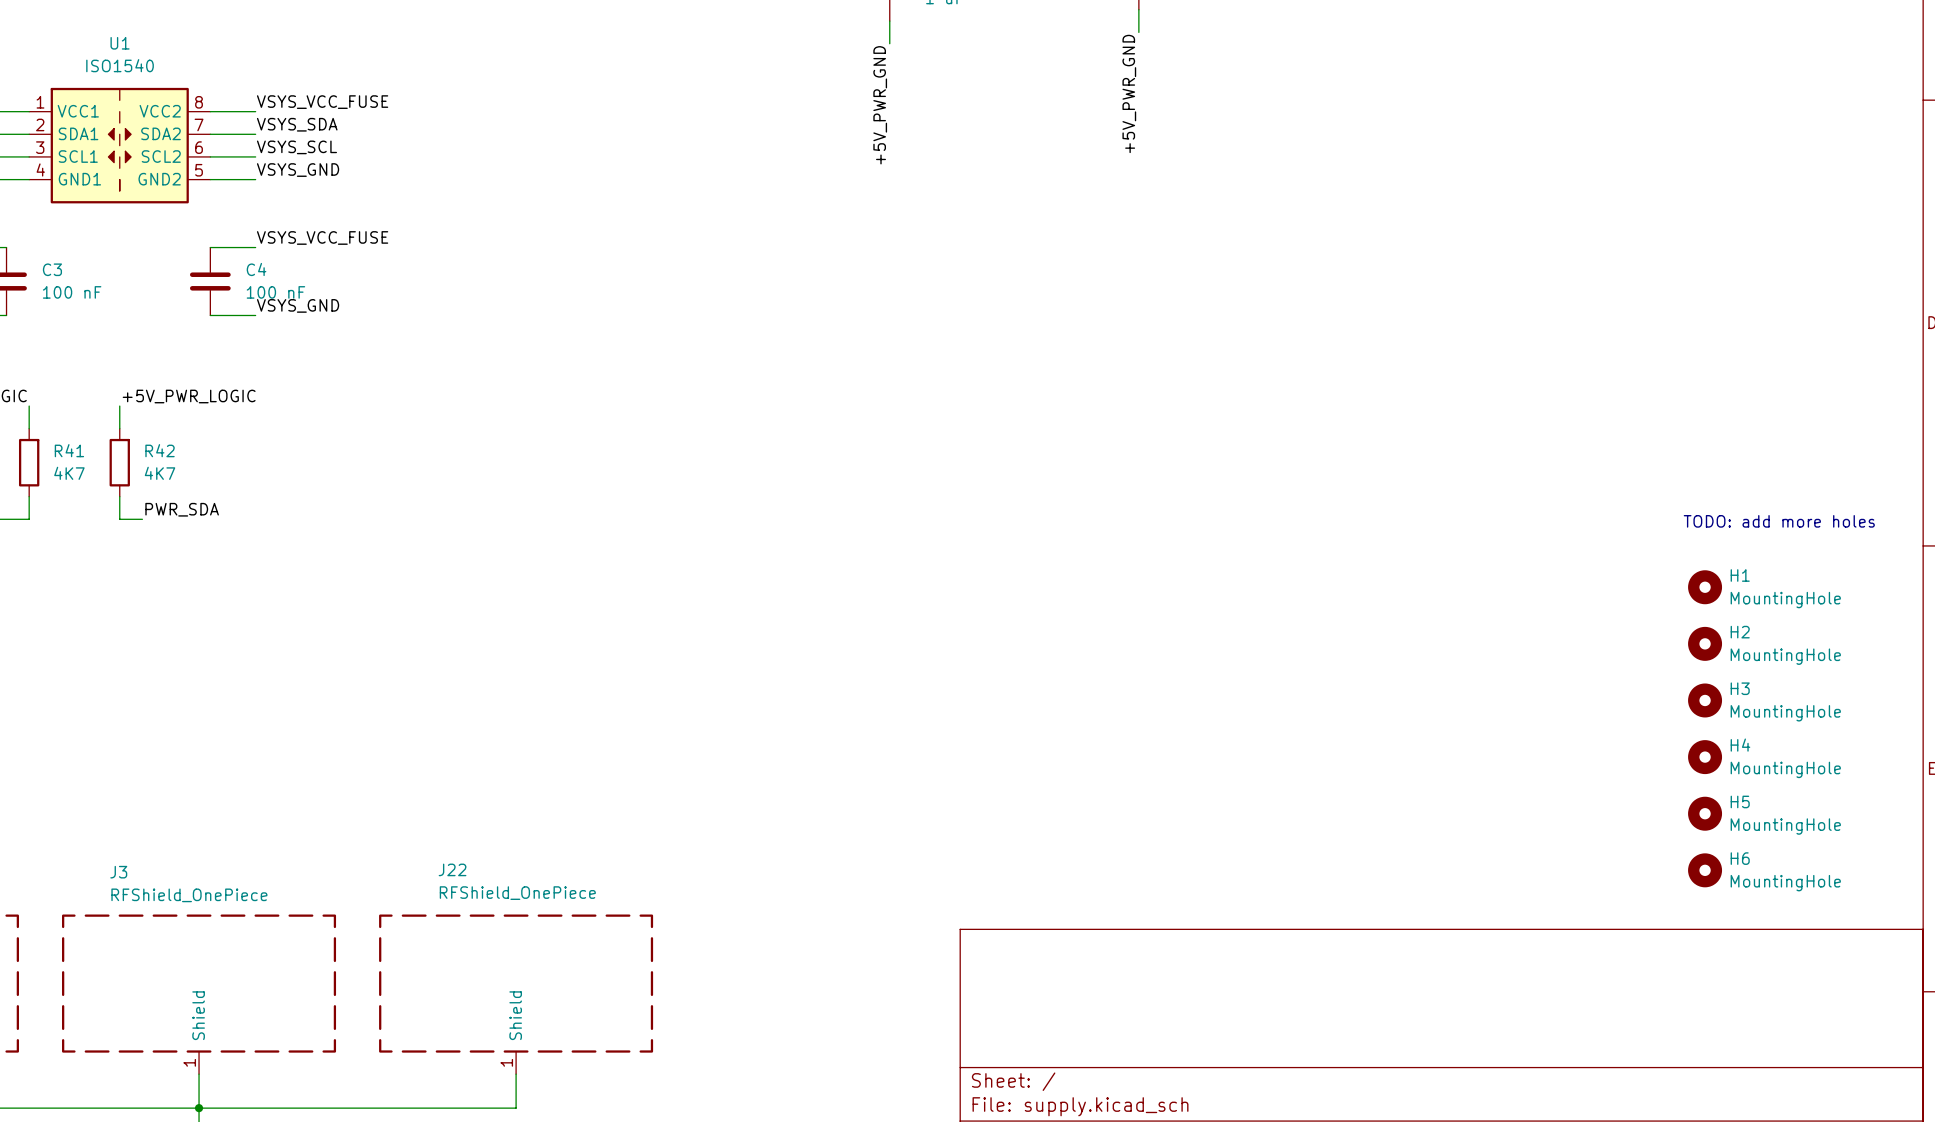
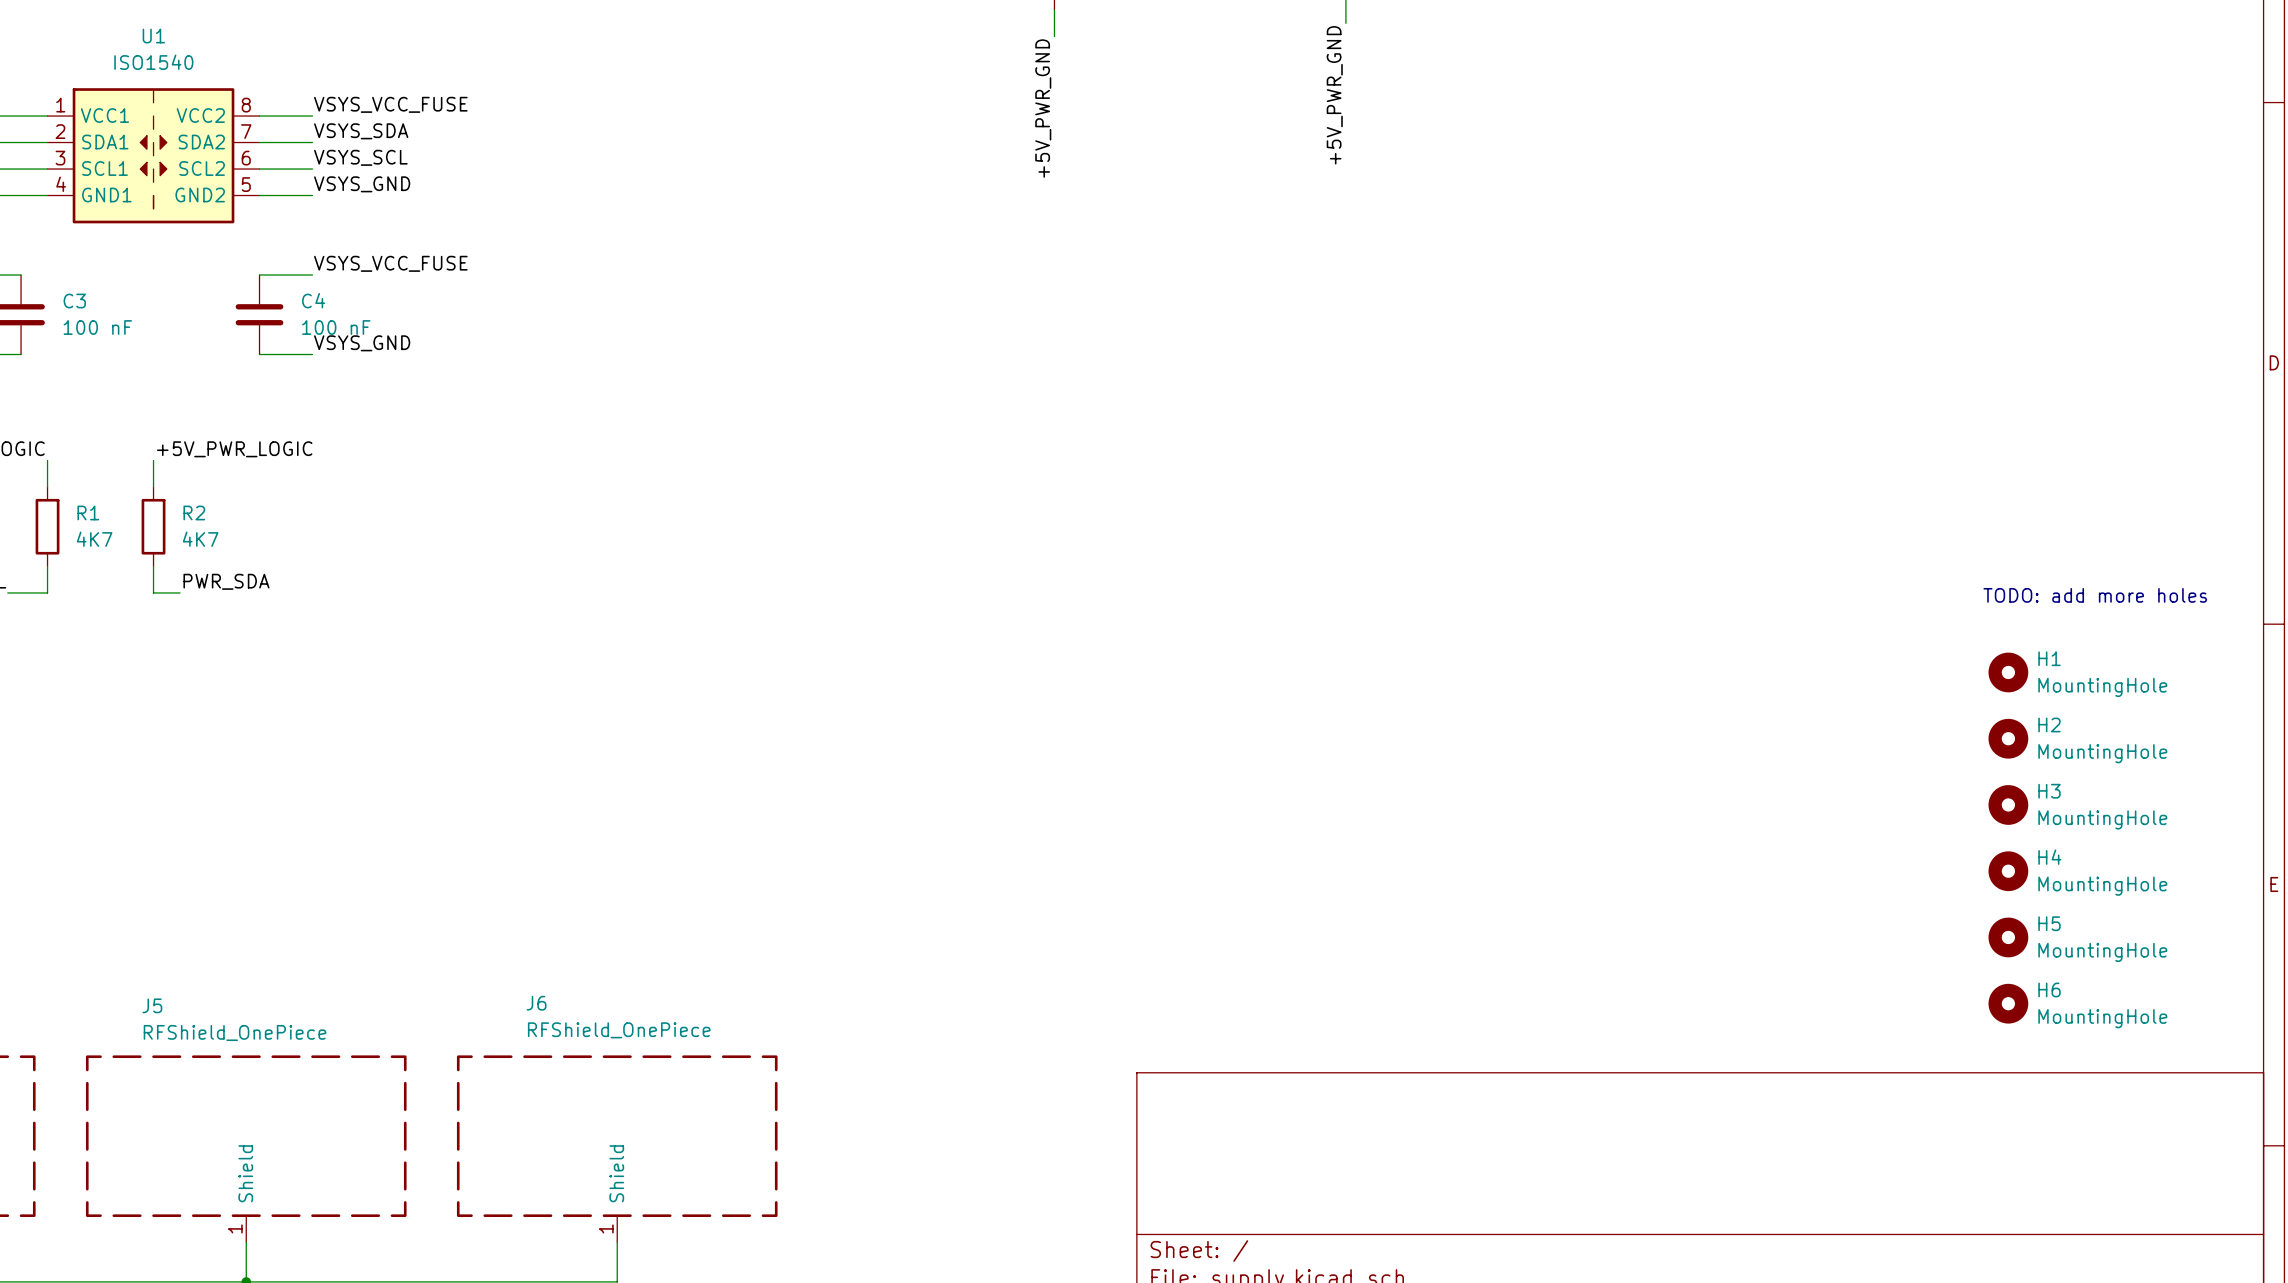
R41 name: R41 (69, 450) -> R1 (88, 513)
R42 name: R42 (160, 450) -> R2 (194, 513)
J22 name: J22 (452, 869) -> J6 (536, 1003)
J3 name: J3 (118, 872) -> J5 (152, 1005)

